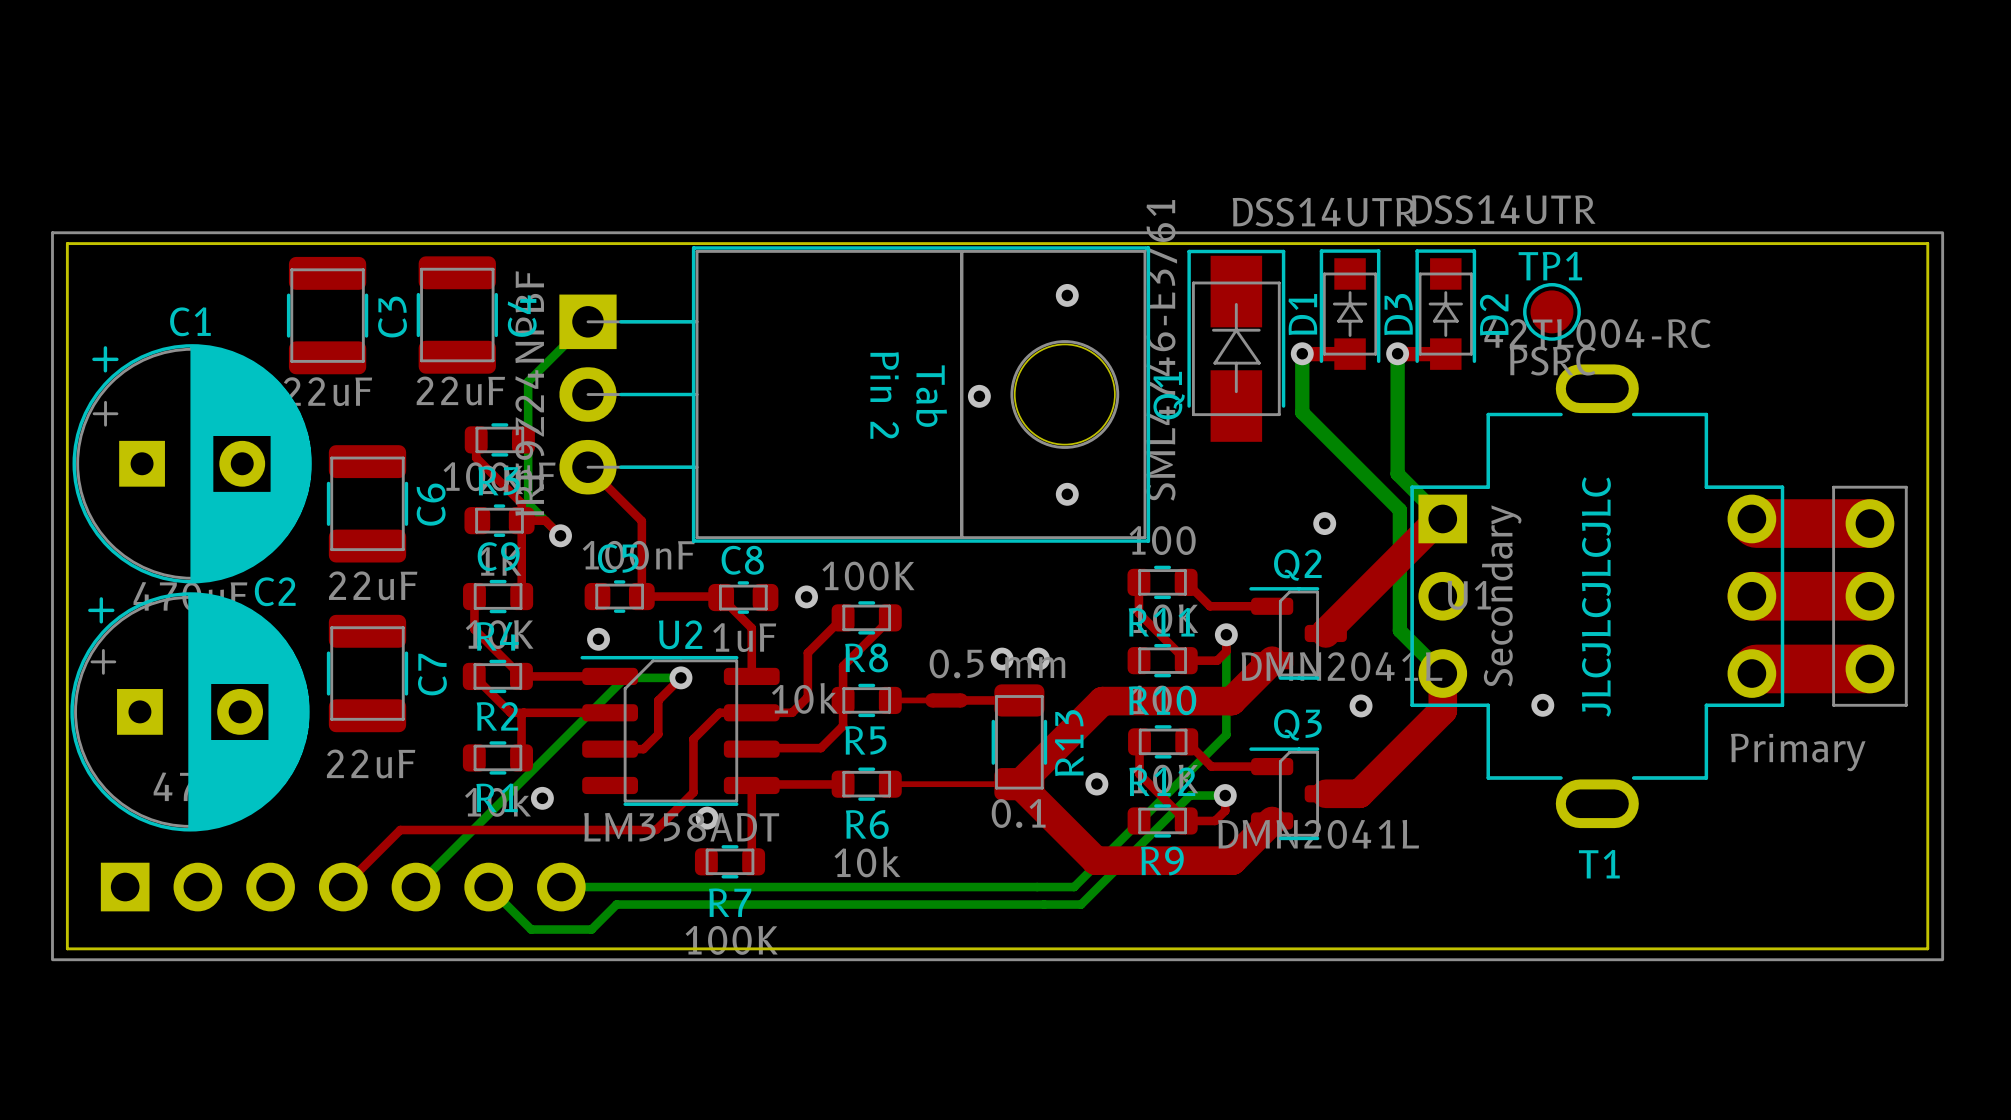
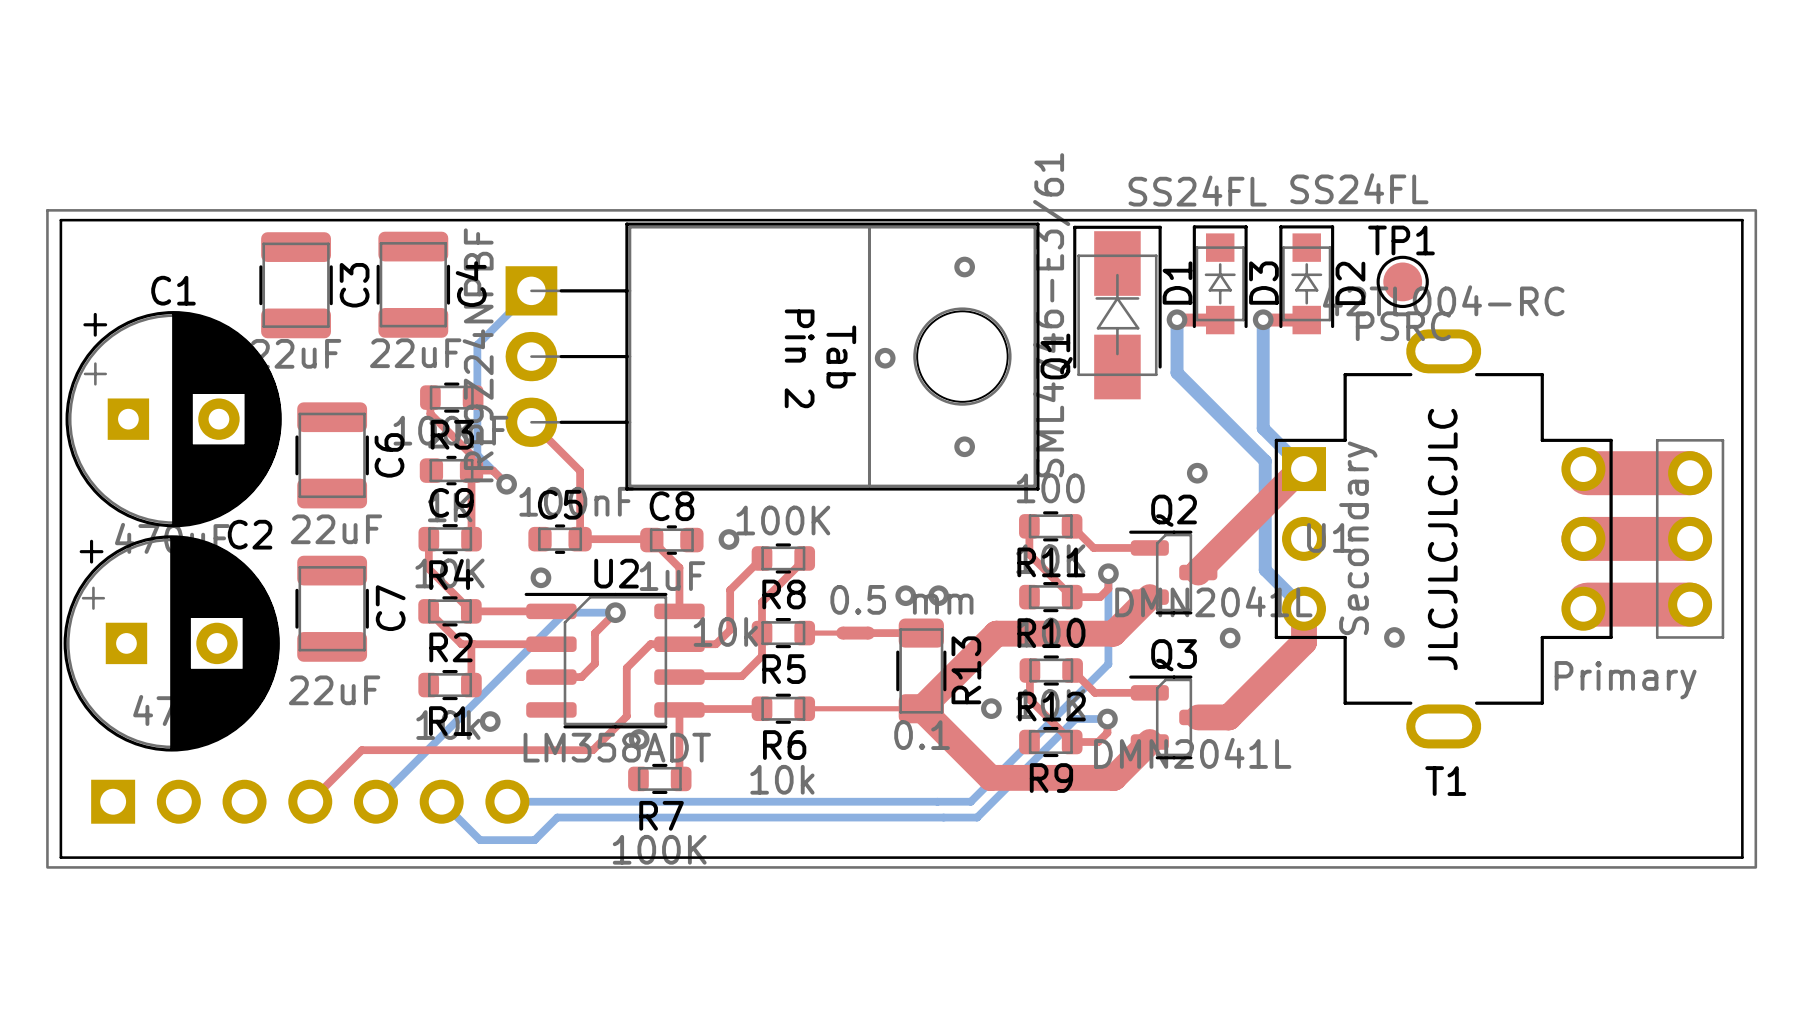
D2 value: DSS14UTR (1503, 209) -> SS24FL (1359, 188)
D3 value: DSS14UTR (1324, 212) -> SS24FL (1197, 191)

